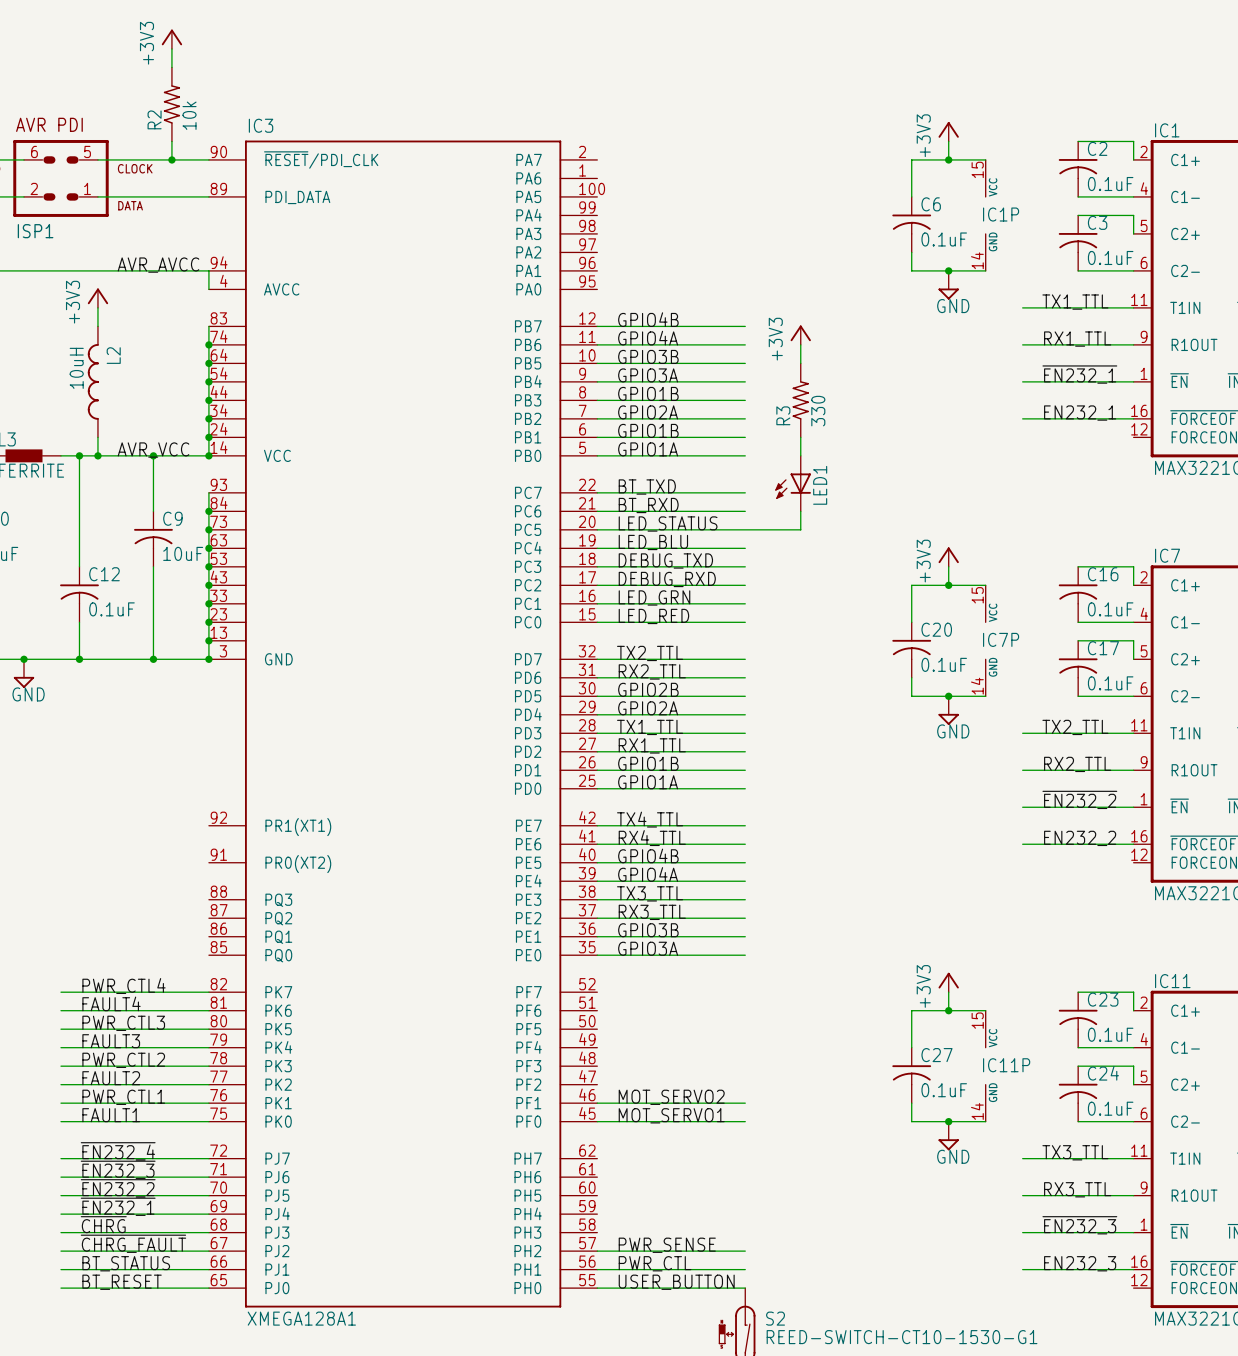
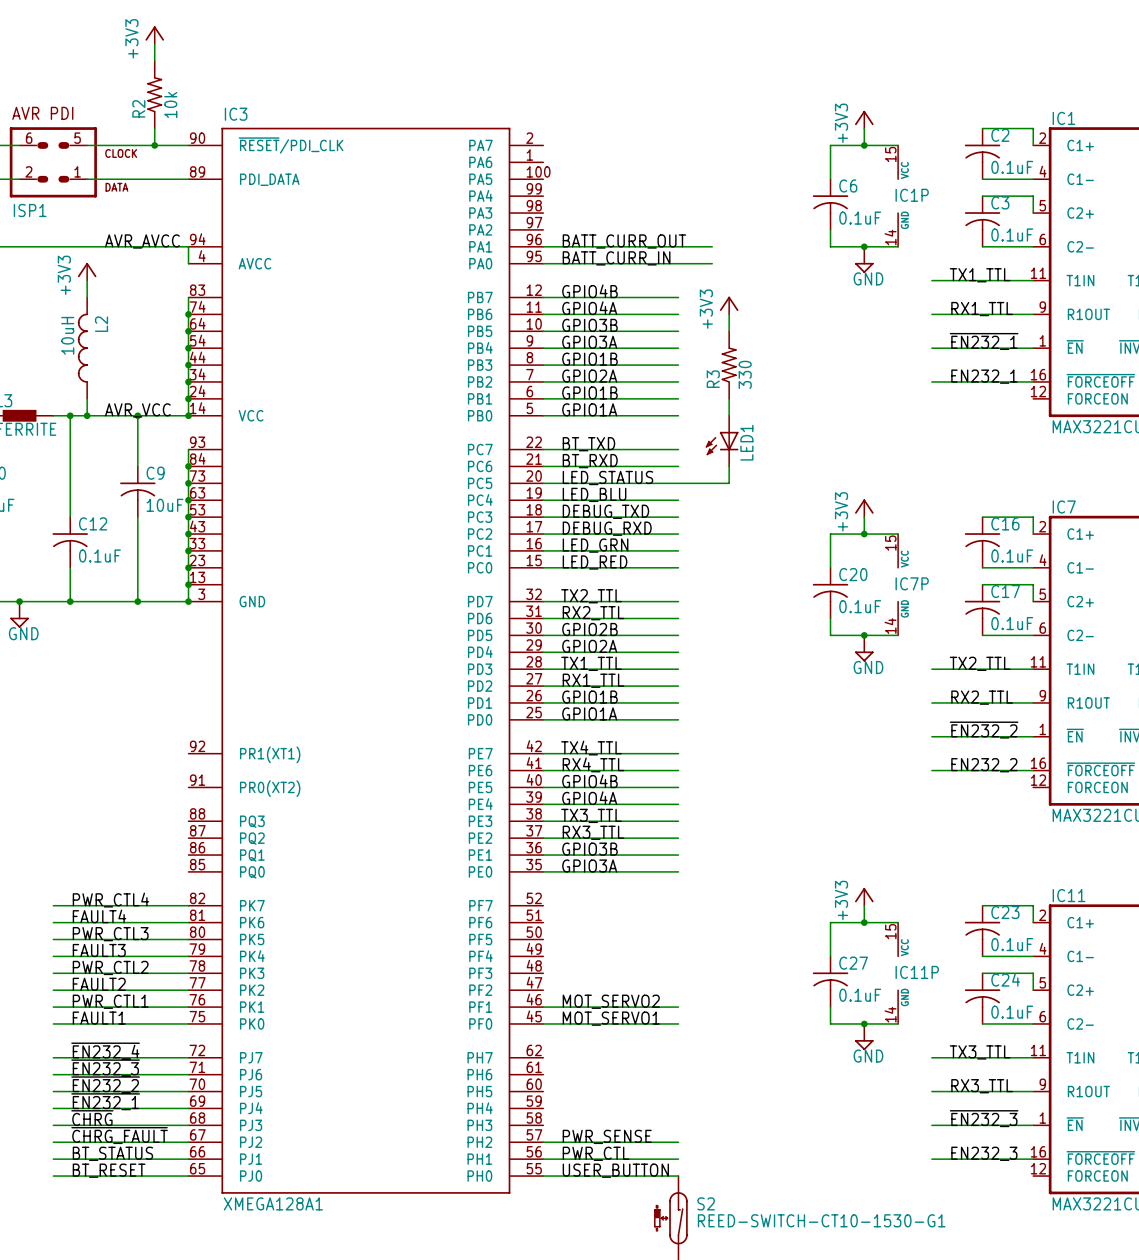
label: none -> BATT_CURR_OUT (624, 241)
wire: none -> (543, 246) (712, 246)
label: none -> BATT_CURR_IN (616, 258)
wire: none -> (543, 263) (712, 263)

